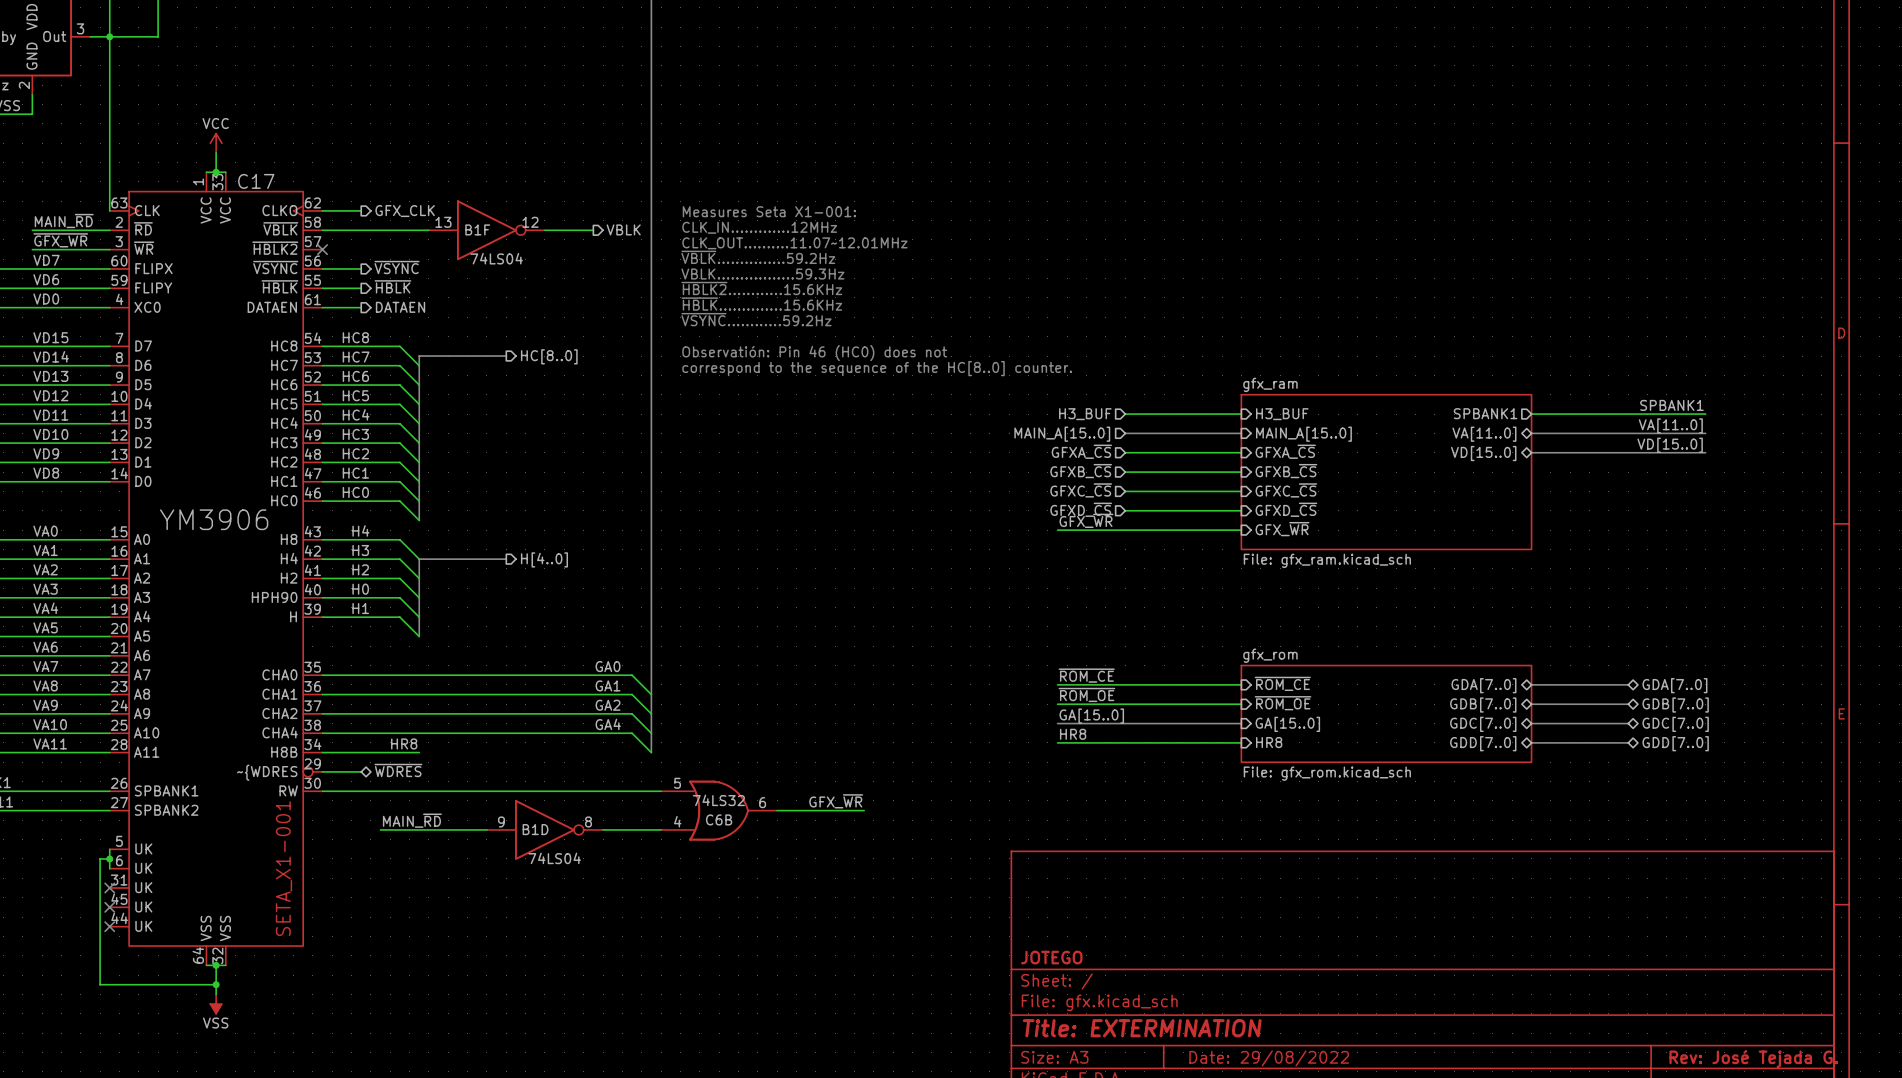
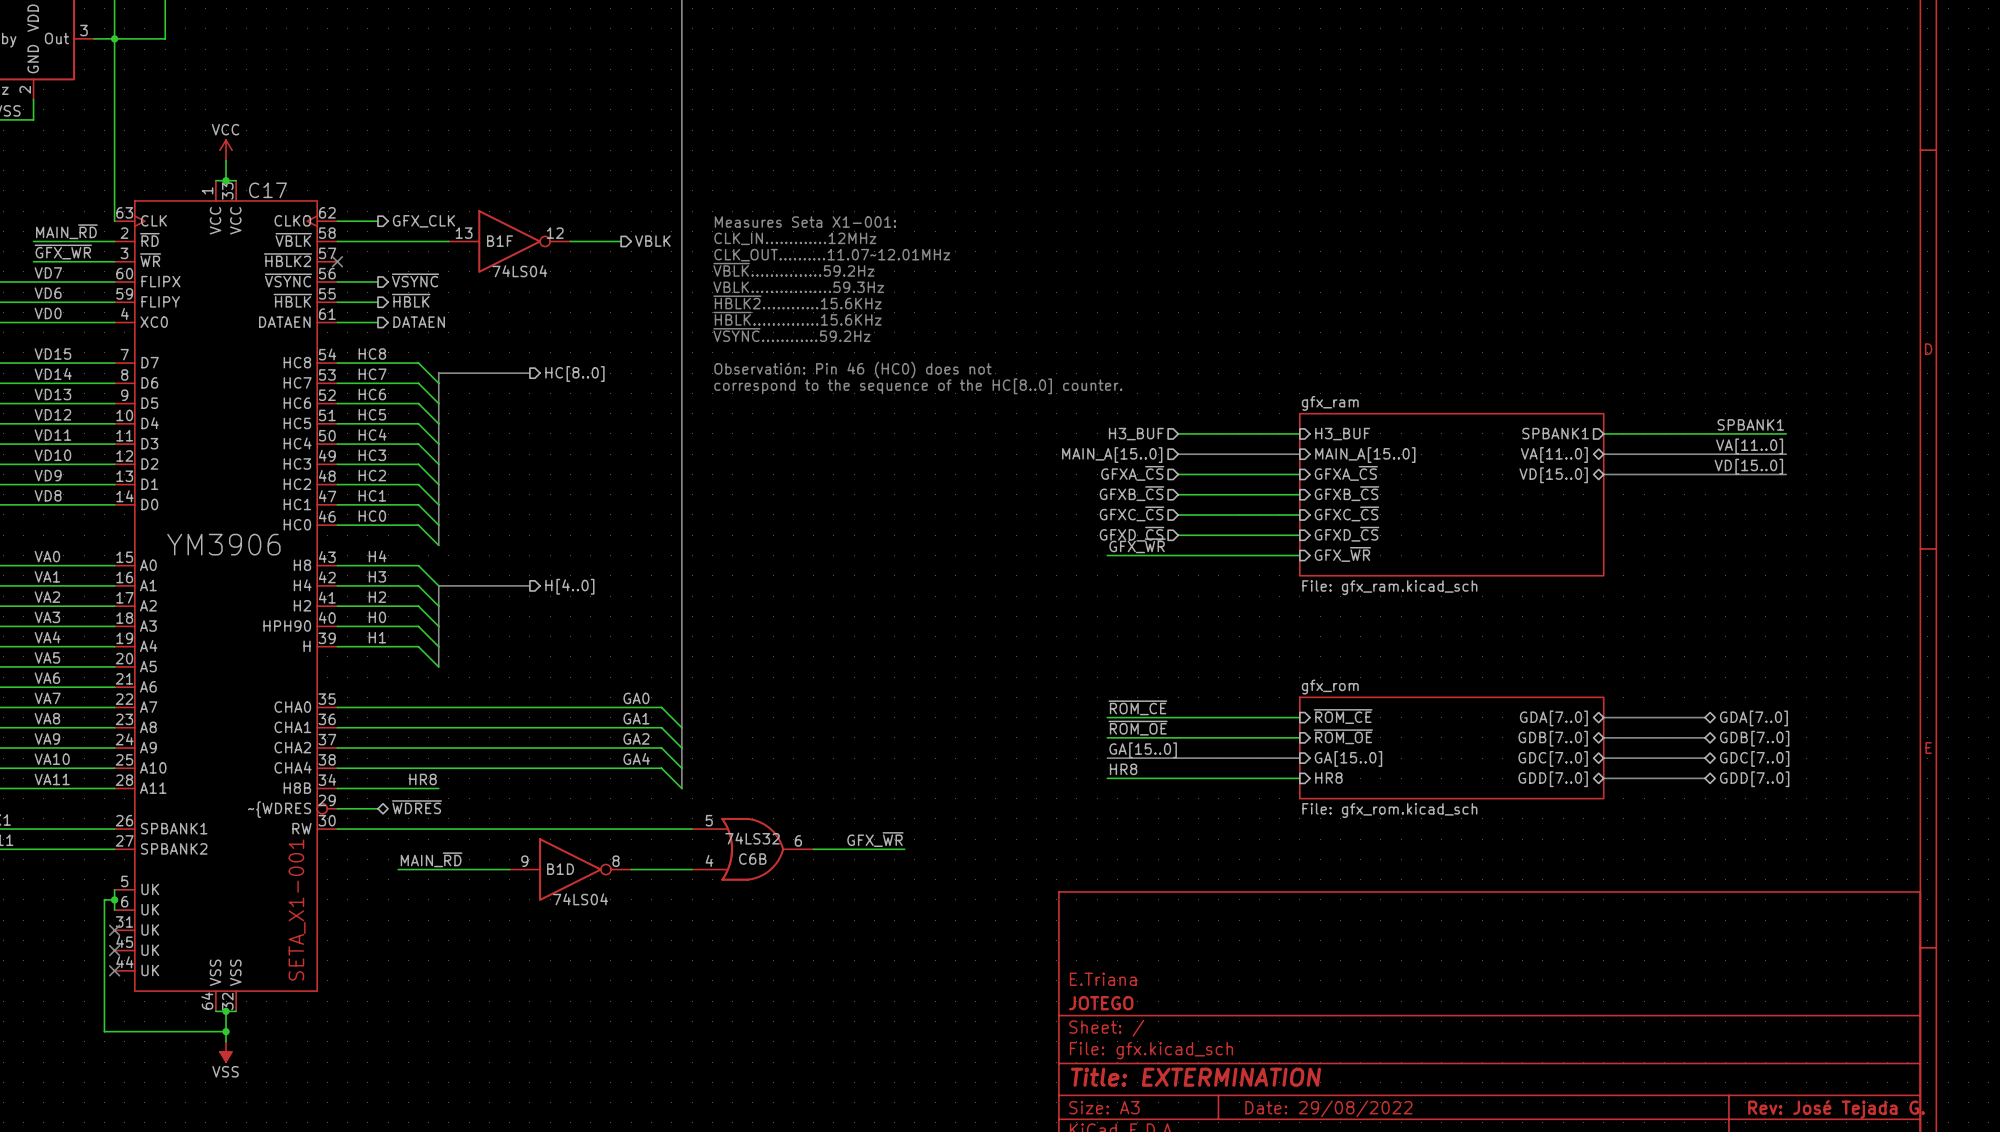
title block: none -> E.Triana (1103, 979)

